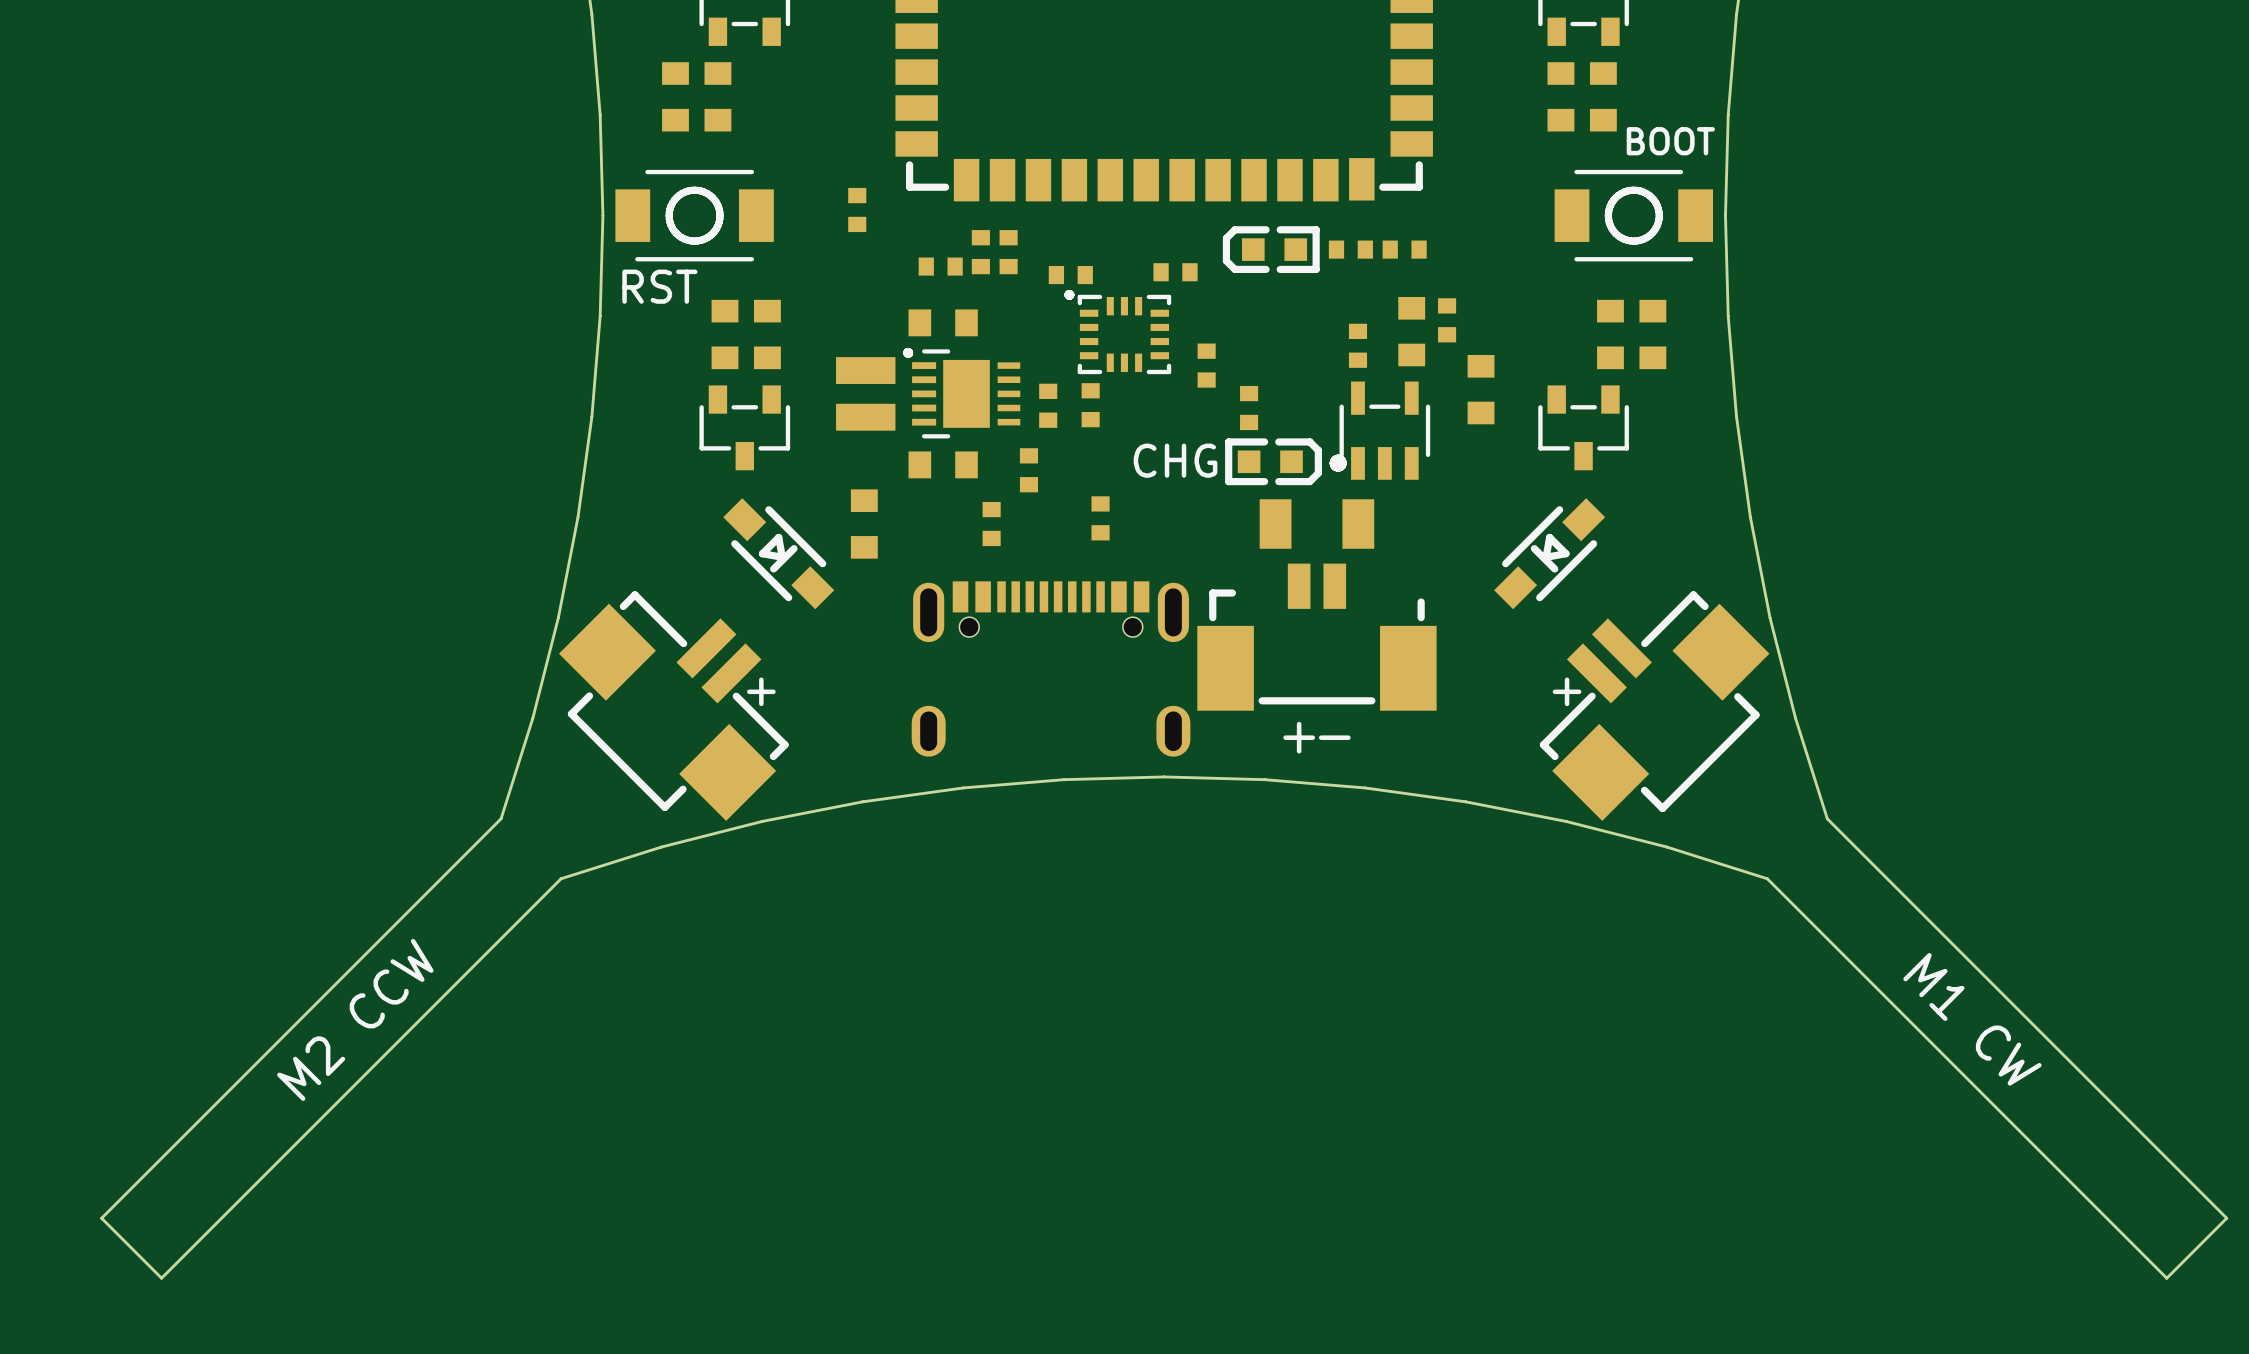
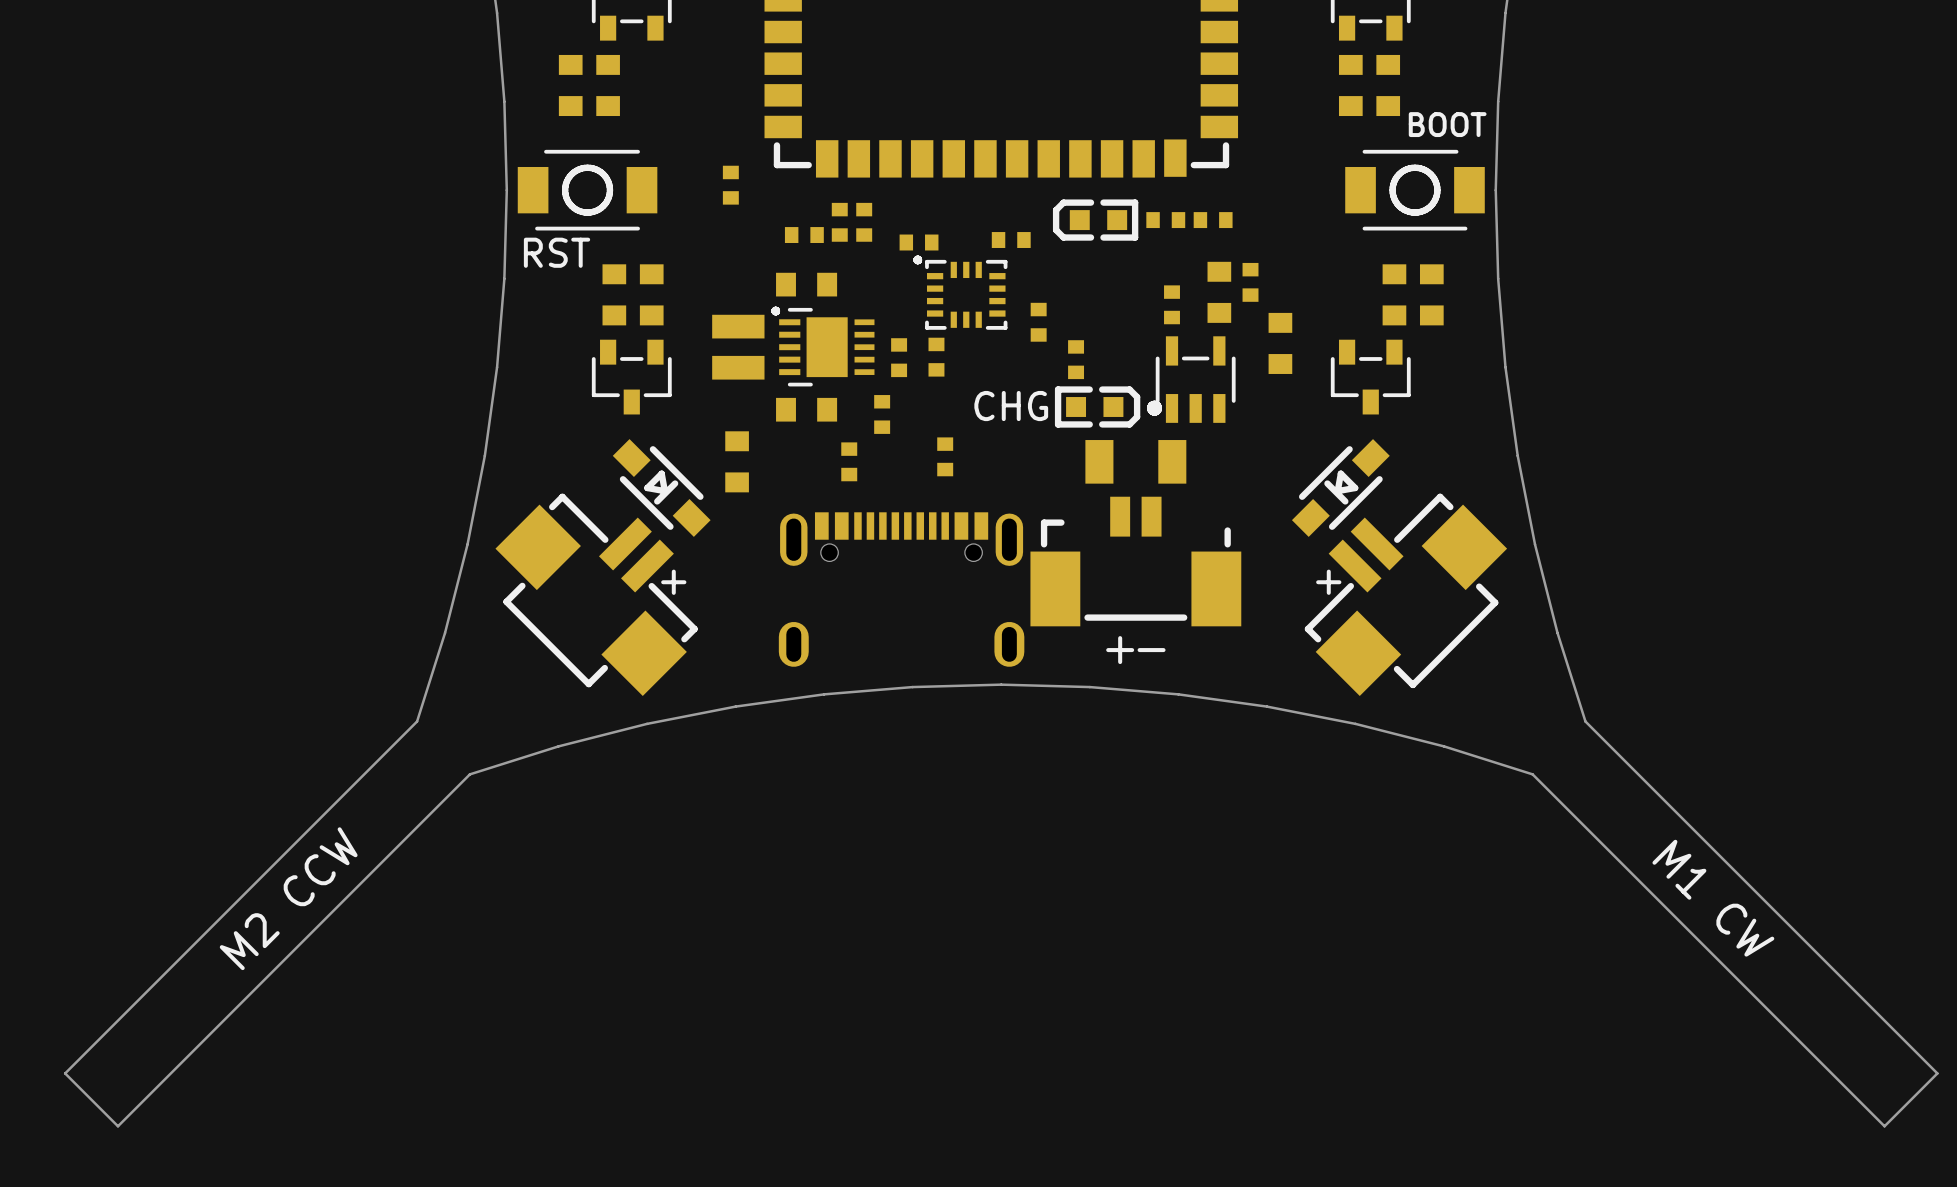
text position: + (761, 691) -> + (673, 582)
text position: + (1567, 691) -> + (1328, 582)
part position: (673, 706) -> (596, 594)
part position: (1654, 706) -> (1405, 594)

